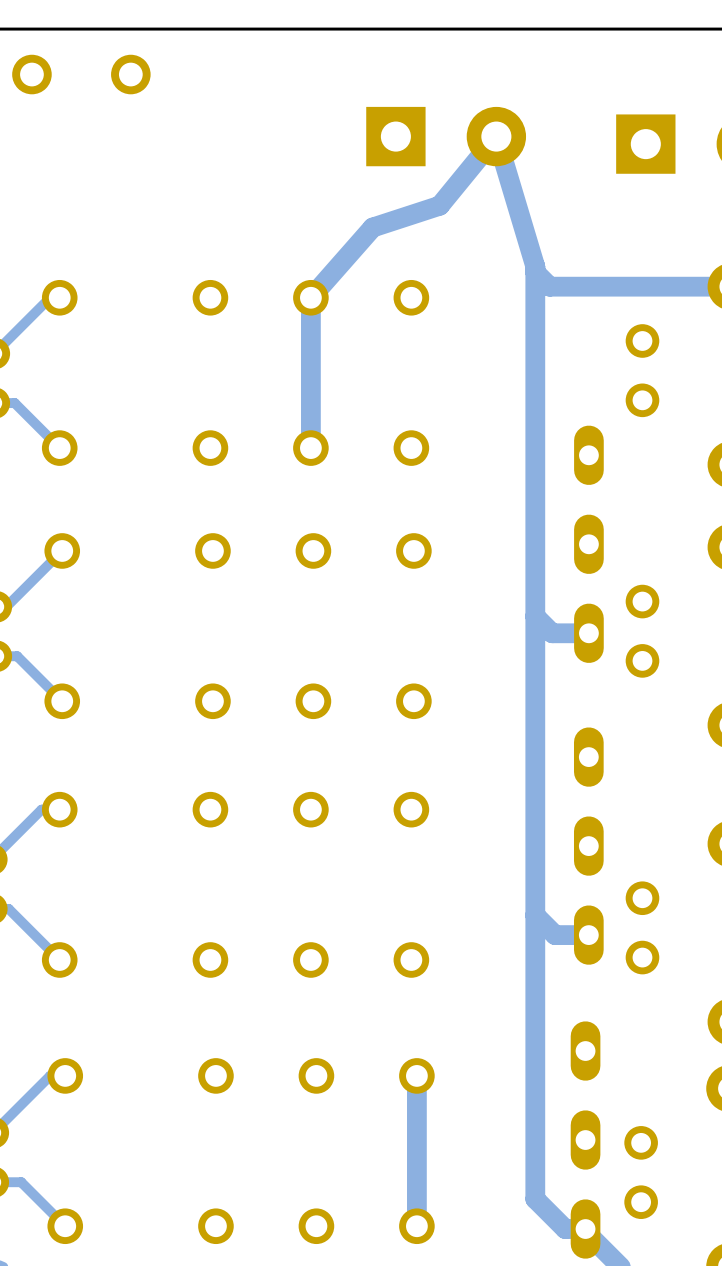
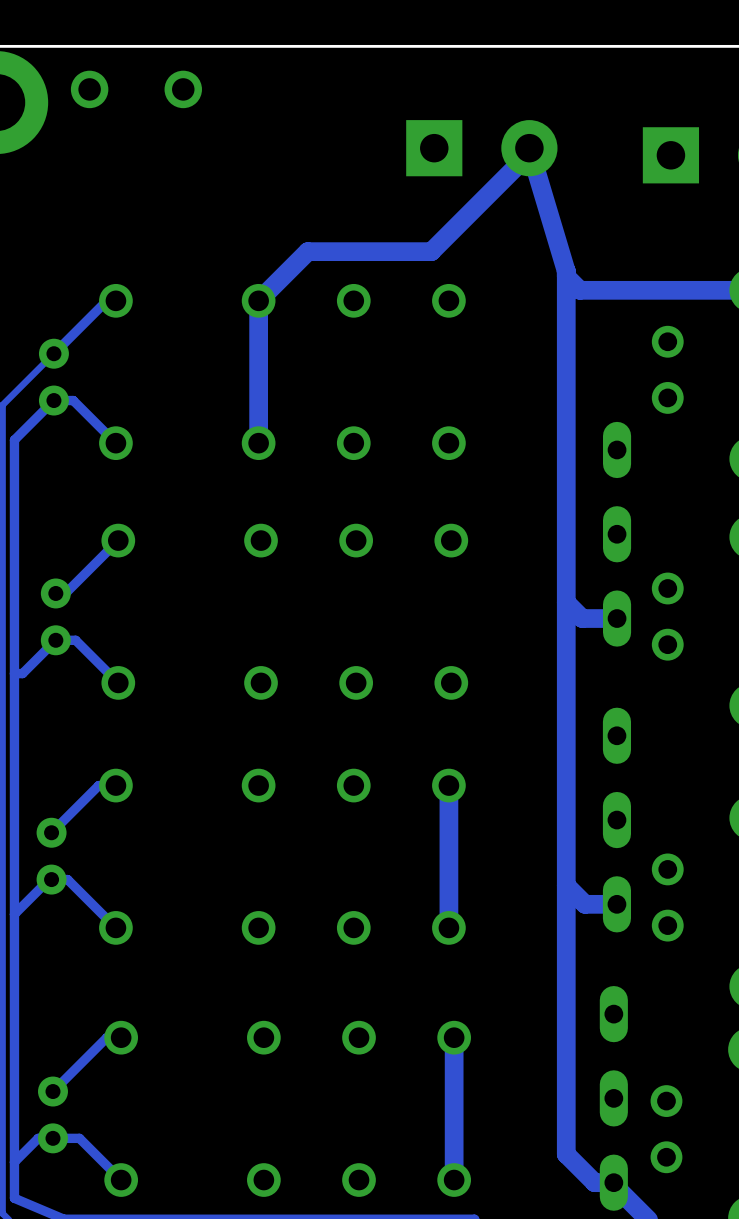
track: (496, 136) (439, 205) (372, 227) (310, 297) (310, 448) -> (529, 148) (529, 153) (431, 251) (307, 251) (258, 300) (258, 443)
track: none -> (448, 785) (448, 927)

